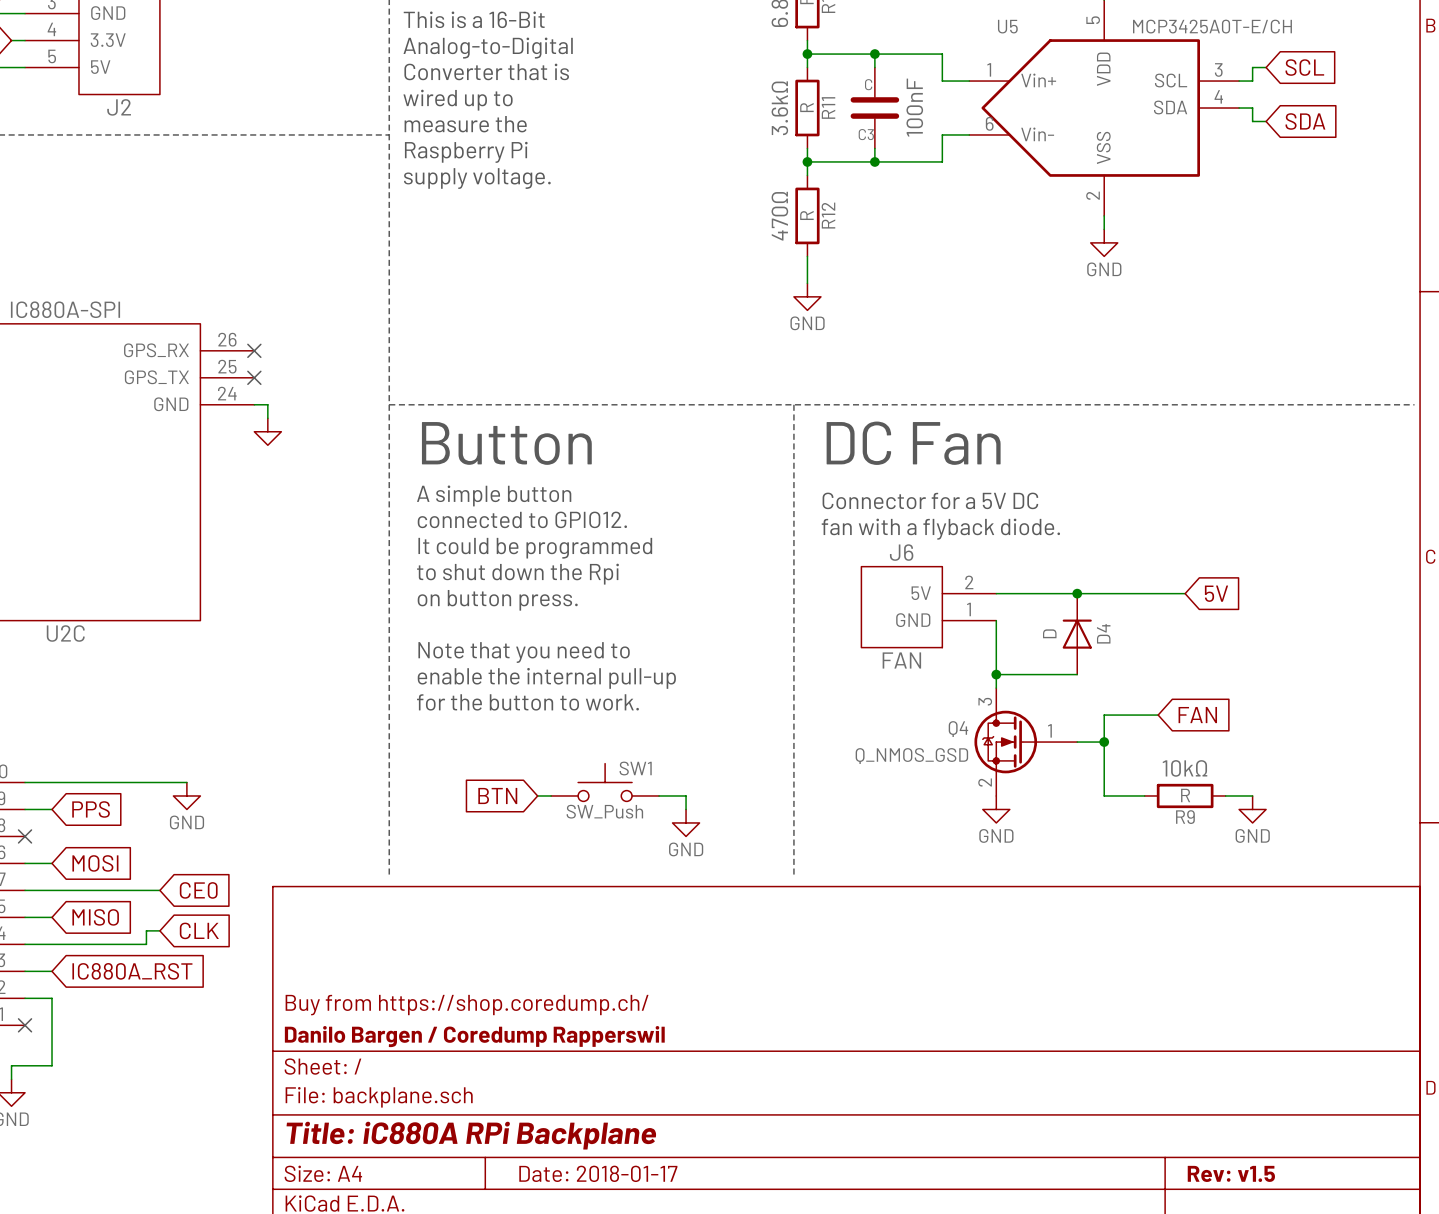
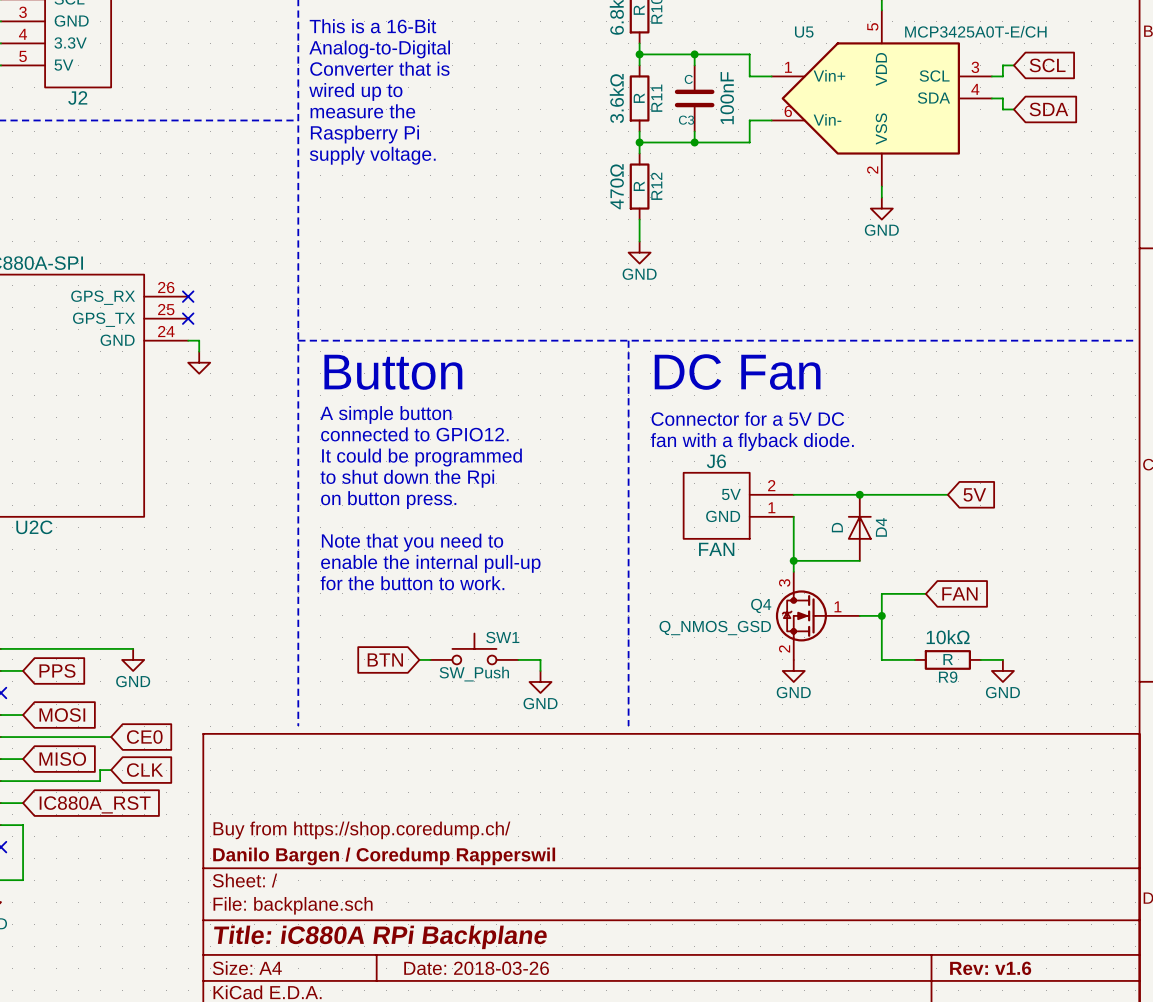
title block: Date: 2018-01-17 (598, 1173) -> Date: 2018-03-26 (476, 968)
title block: Rev: v1.5 (1231, 1173) -> Rev: v1.6 (990, 968)

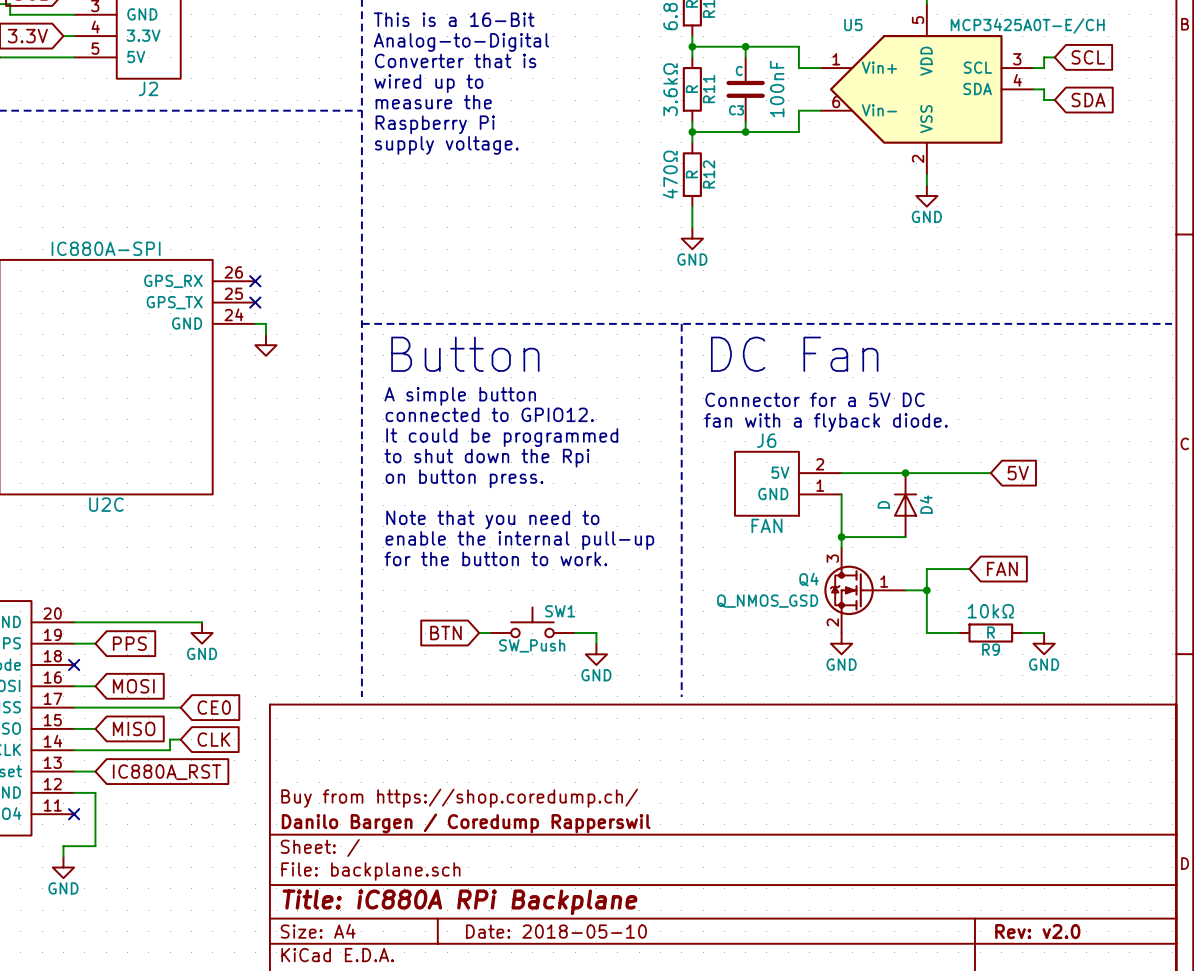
title block: Date: 2018-03-26 (476, 968) -> Date: 2018-05-10 (556, 931)
title block: Rev: v1.6 (990, 968) -> Rev: v2.0 (1037, 931)

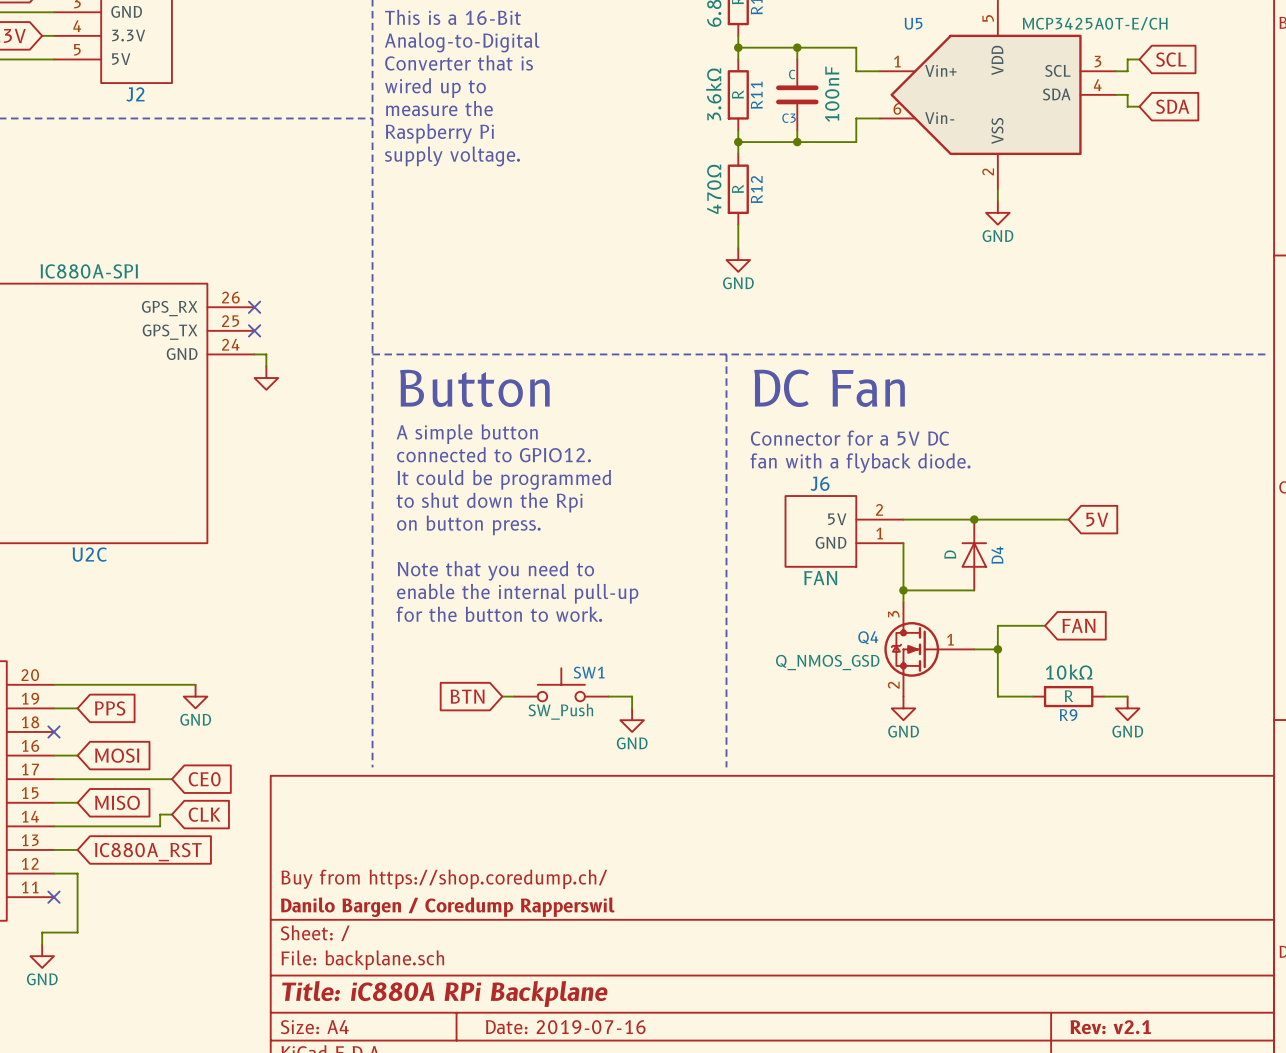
title block: Date: 2018-05-10 (556, 931) -> Date: 2019-07-16 (565, 1027)
title block: Rev: v2.0 (1037, 931) -> Rev: v2.1 (1110, 1027)

